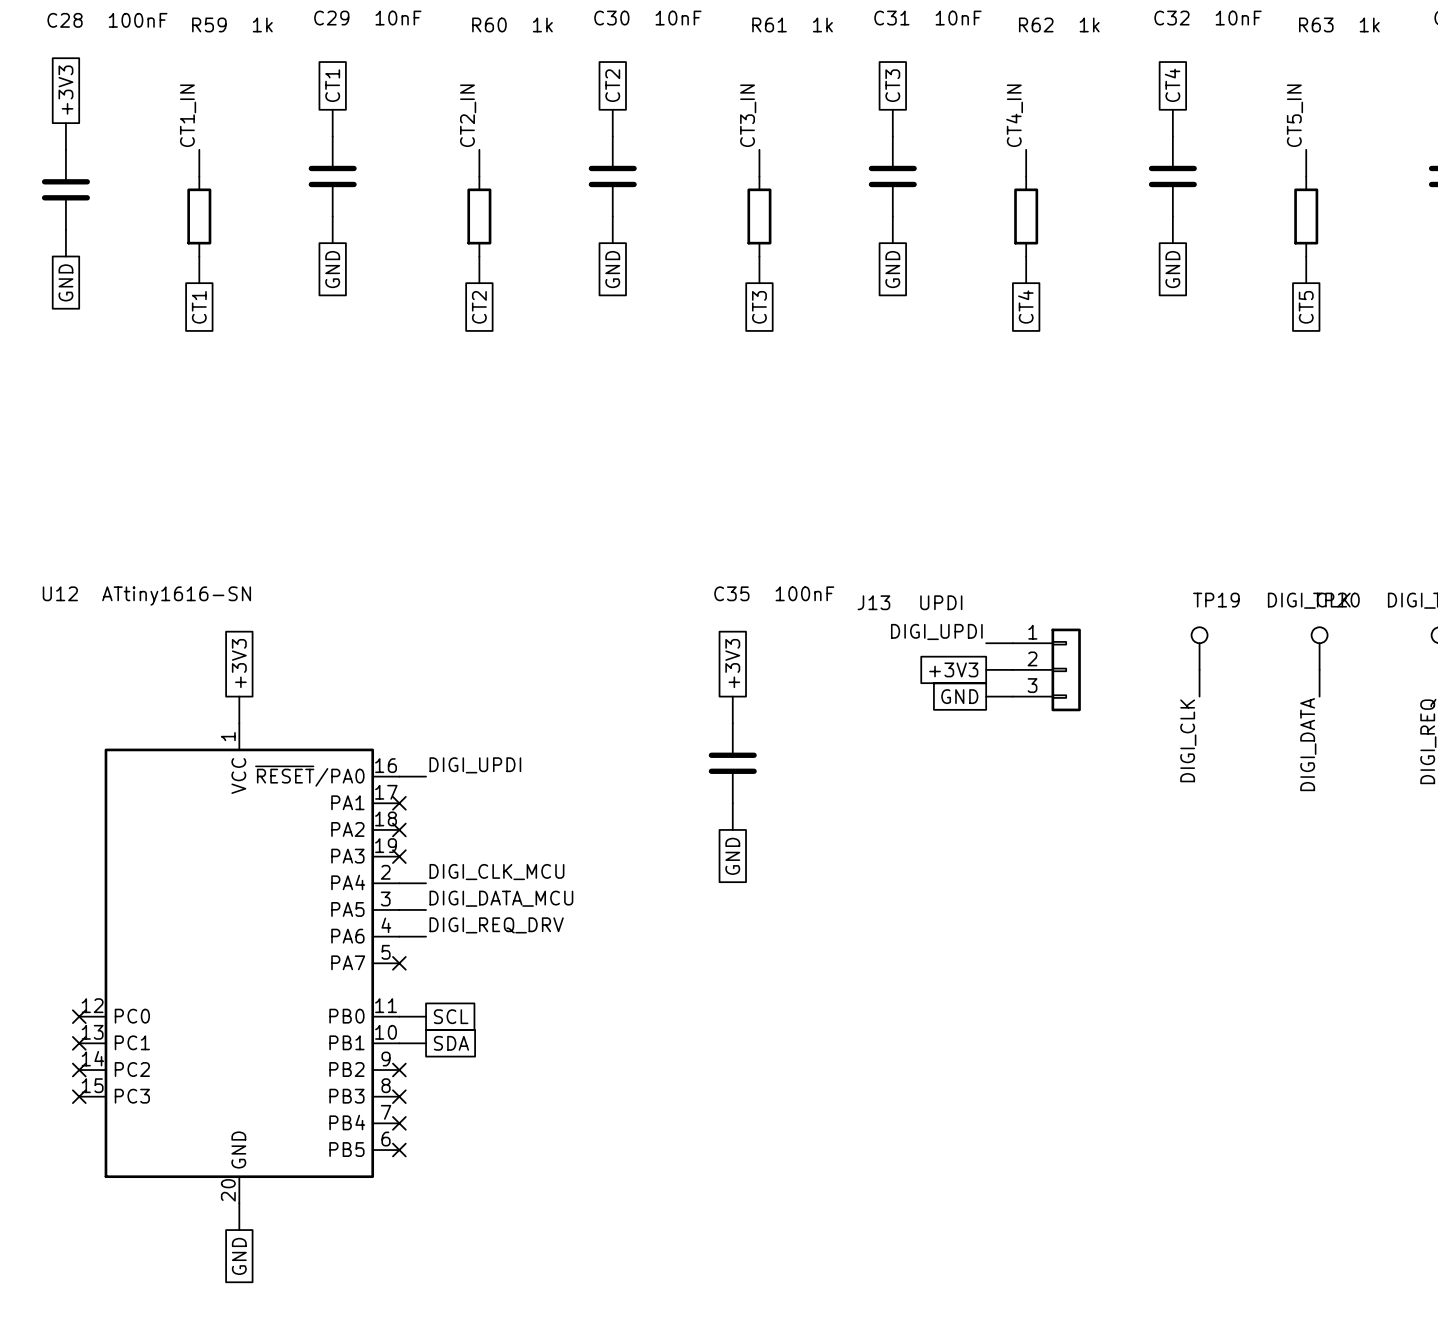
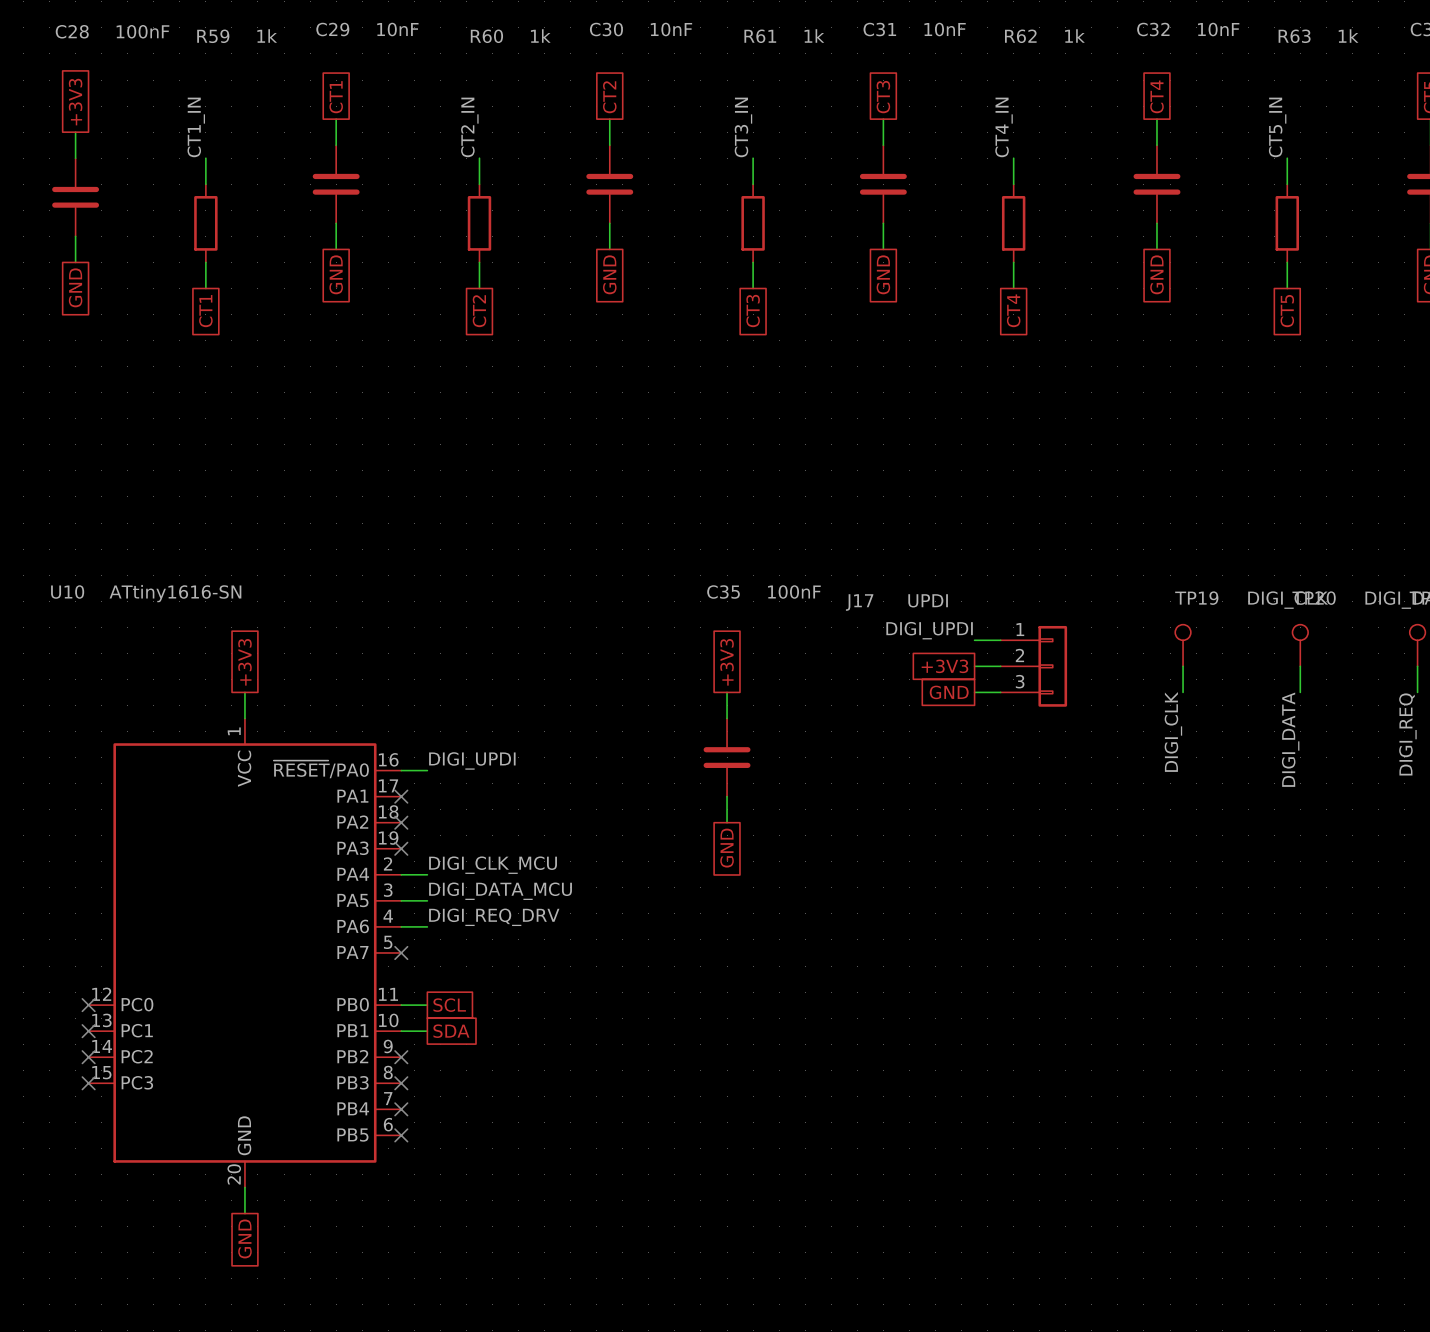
U12 name: U12 (60, 593) -> U10 (67, 592)
J13 name: J13 (873, 602) -> J17 (859, 602)

